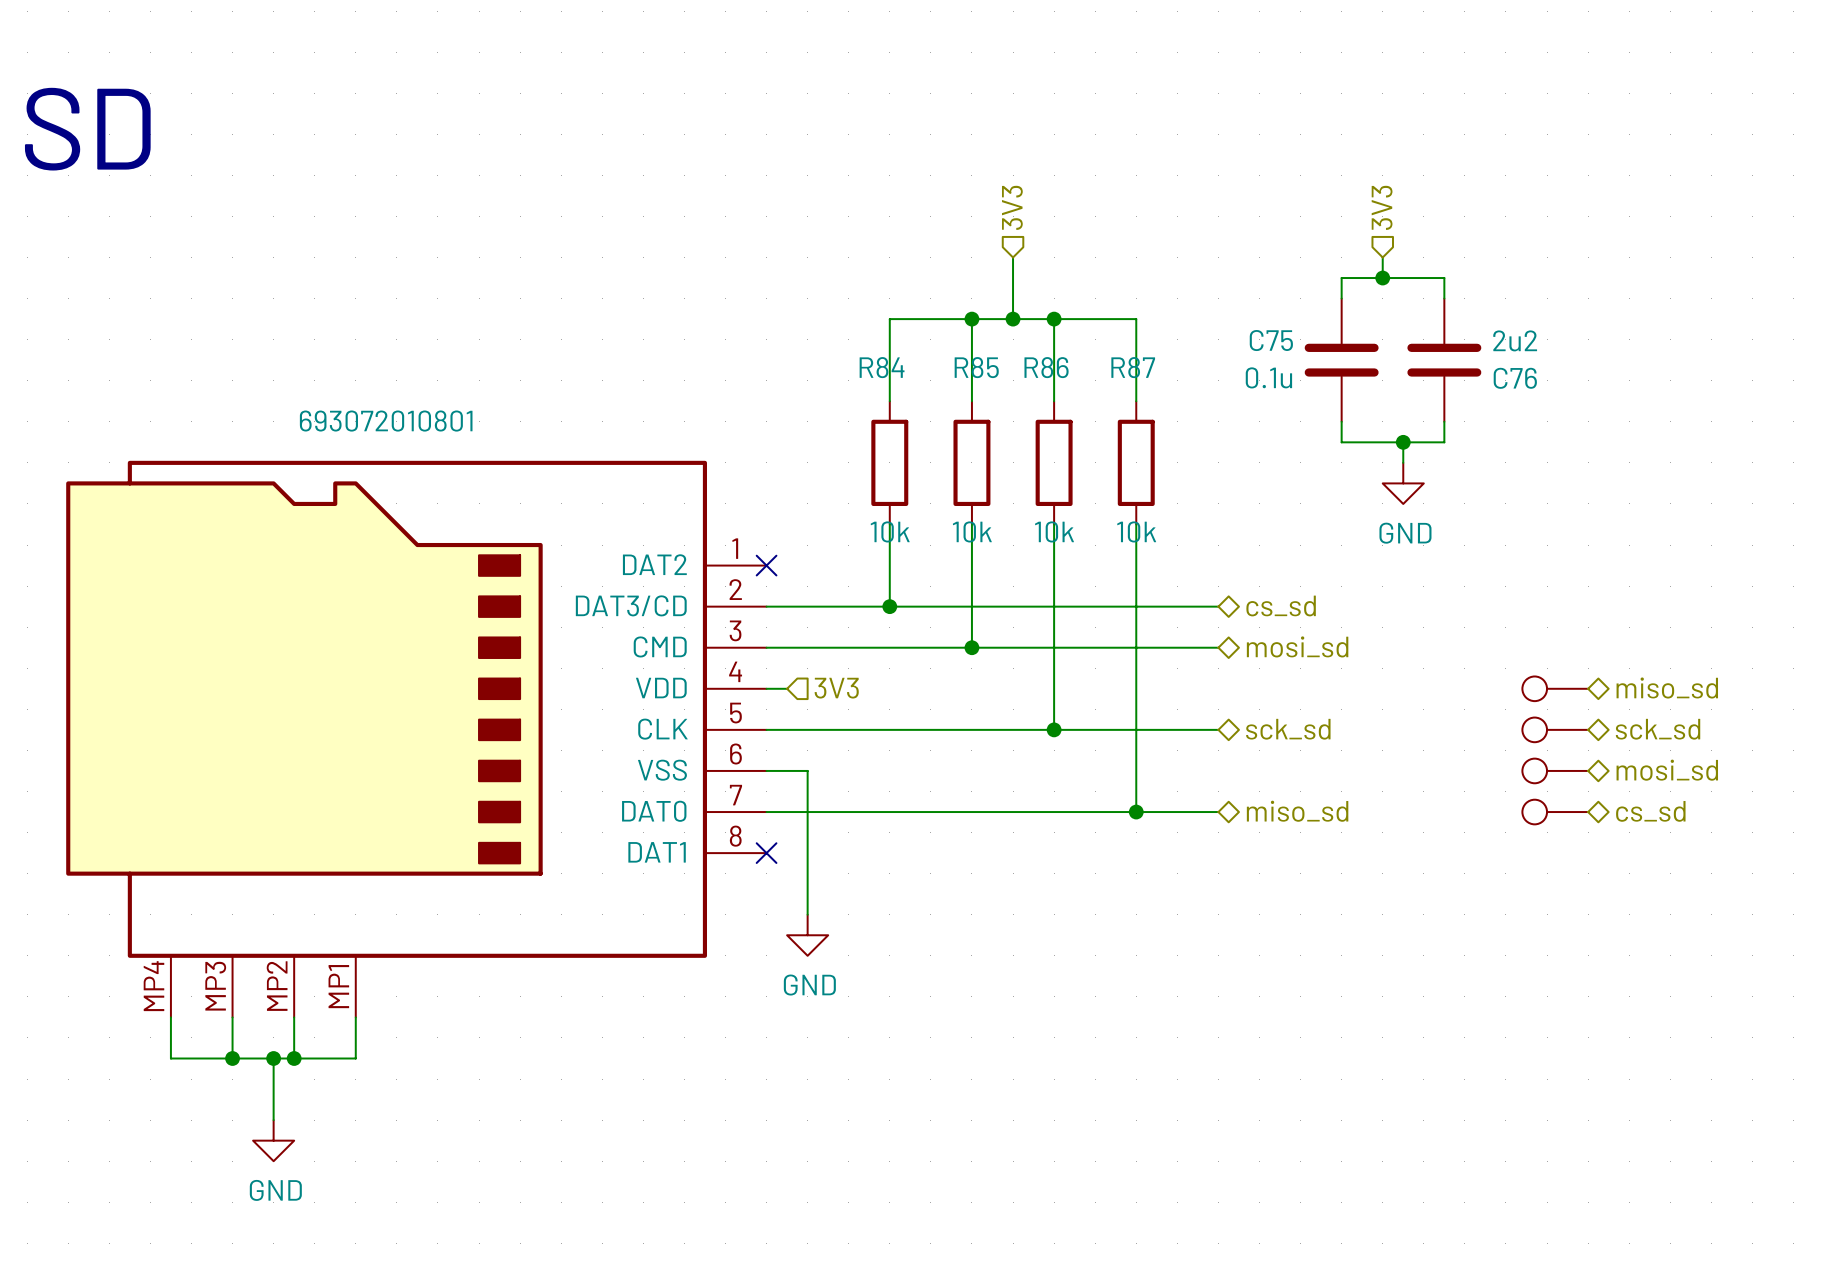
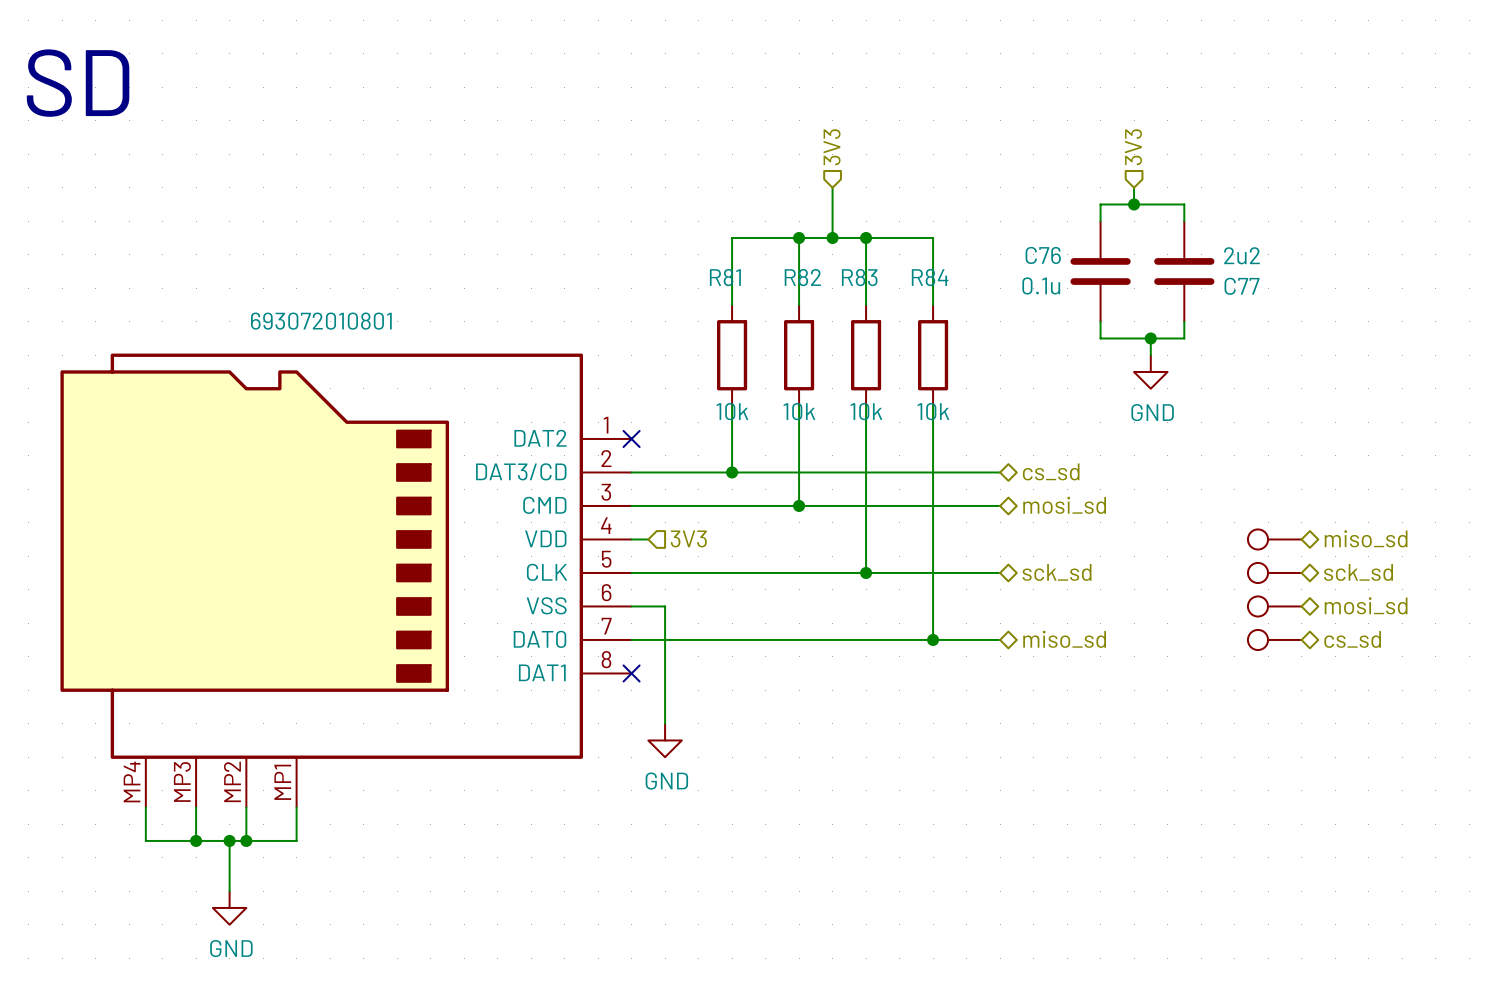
C75 name: C75 (1271, 340) -> C76 (1043, 255)
R84 name: R84 (882, 367) -> R81 (725, 277)
R85 name: R85 (976, 367) -> R82 (802, 277)
R86 name: R86 (1046, 367) -> R83 (859, 277)
R87 name: R87 (1133, 367) -> R84 (930, 277)
C76 name: C76 (1515, 378) -> C77 (1242, 286)

